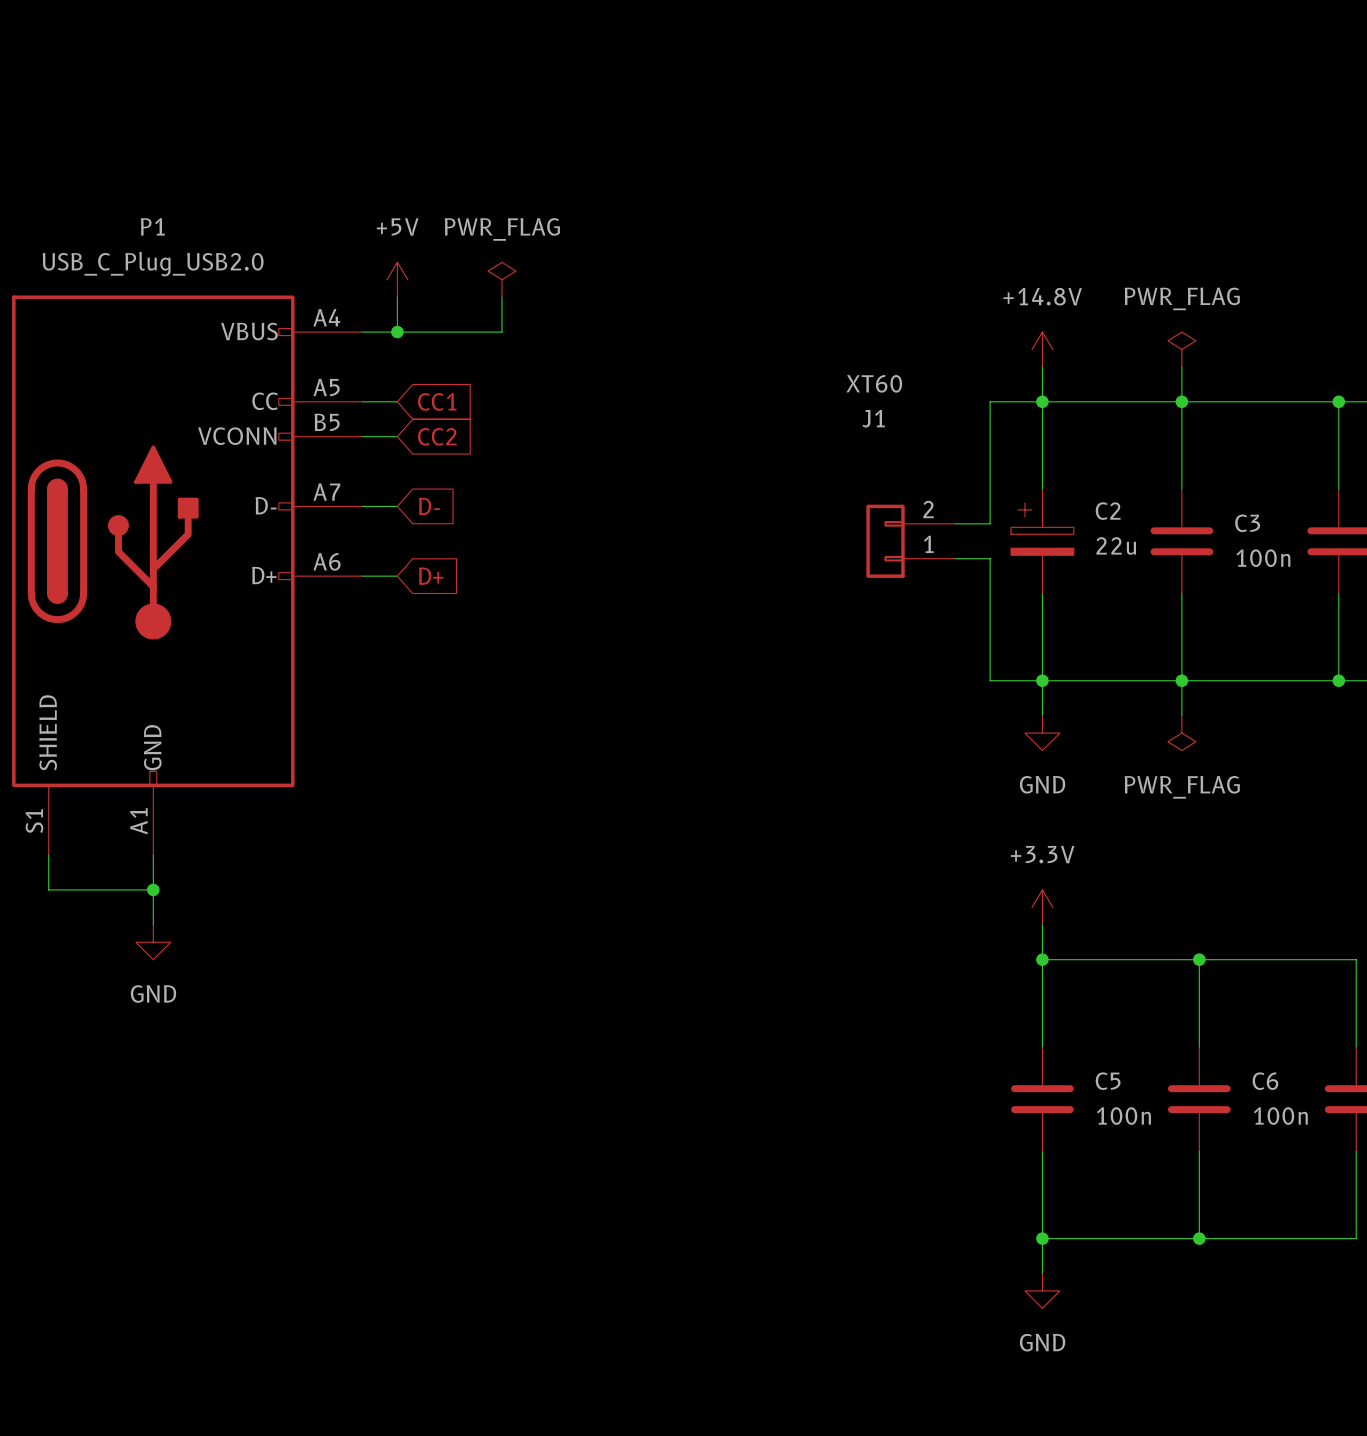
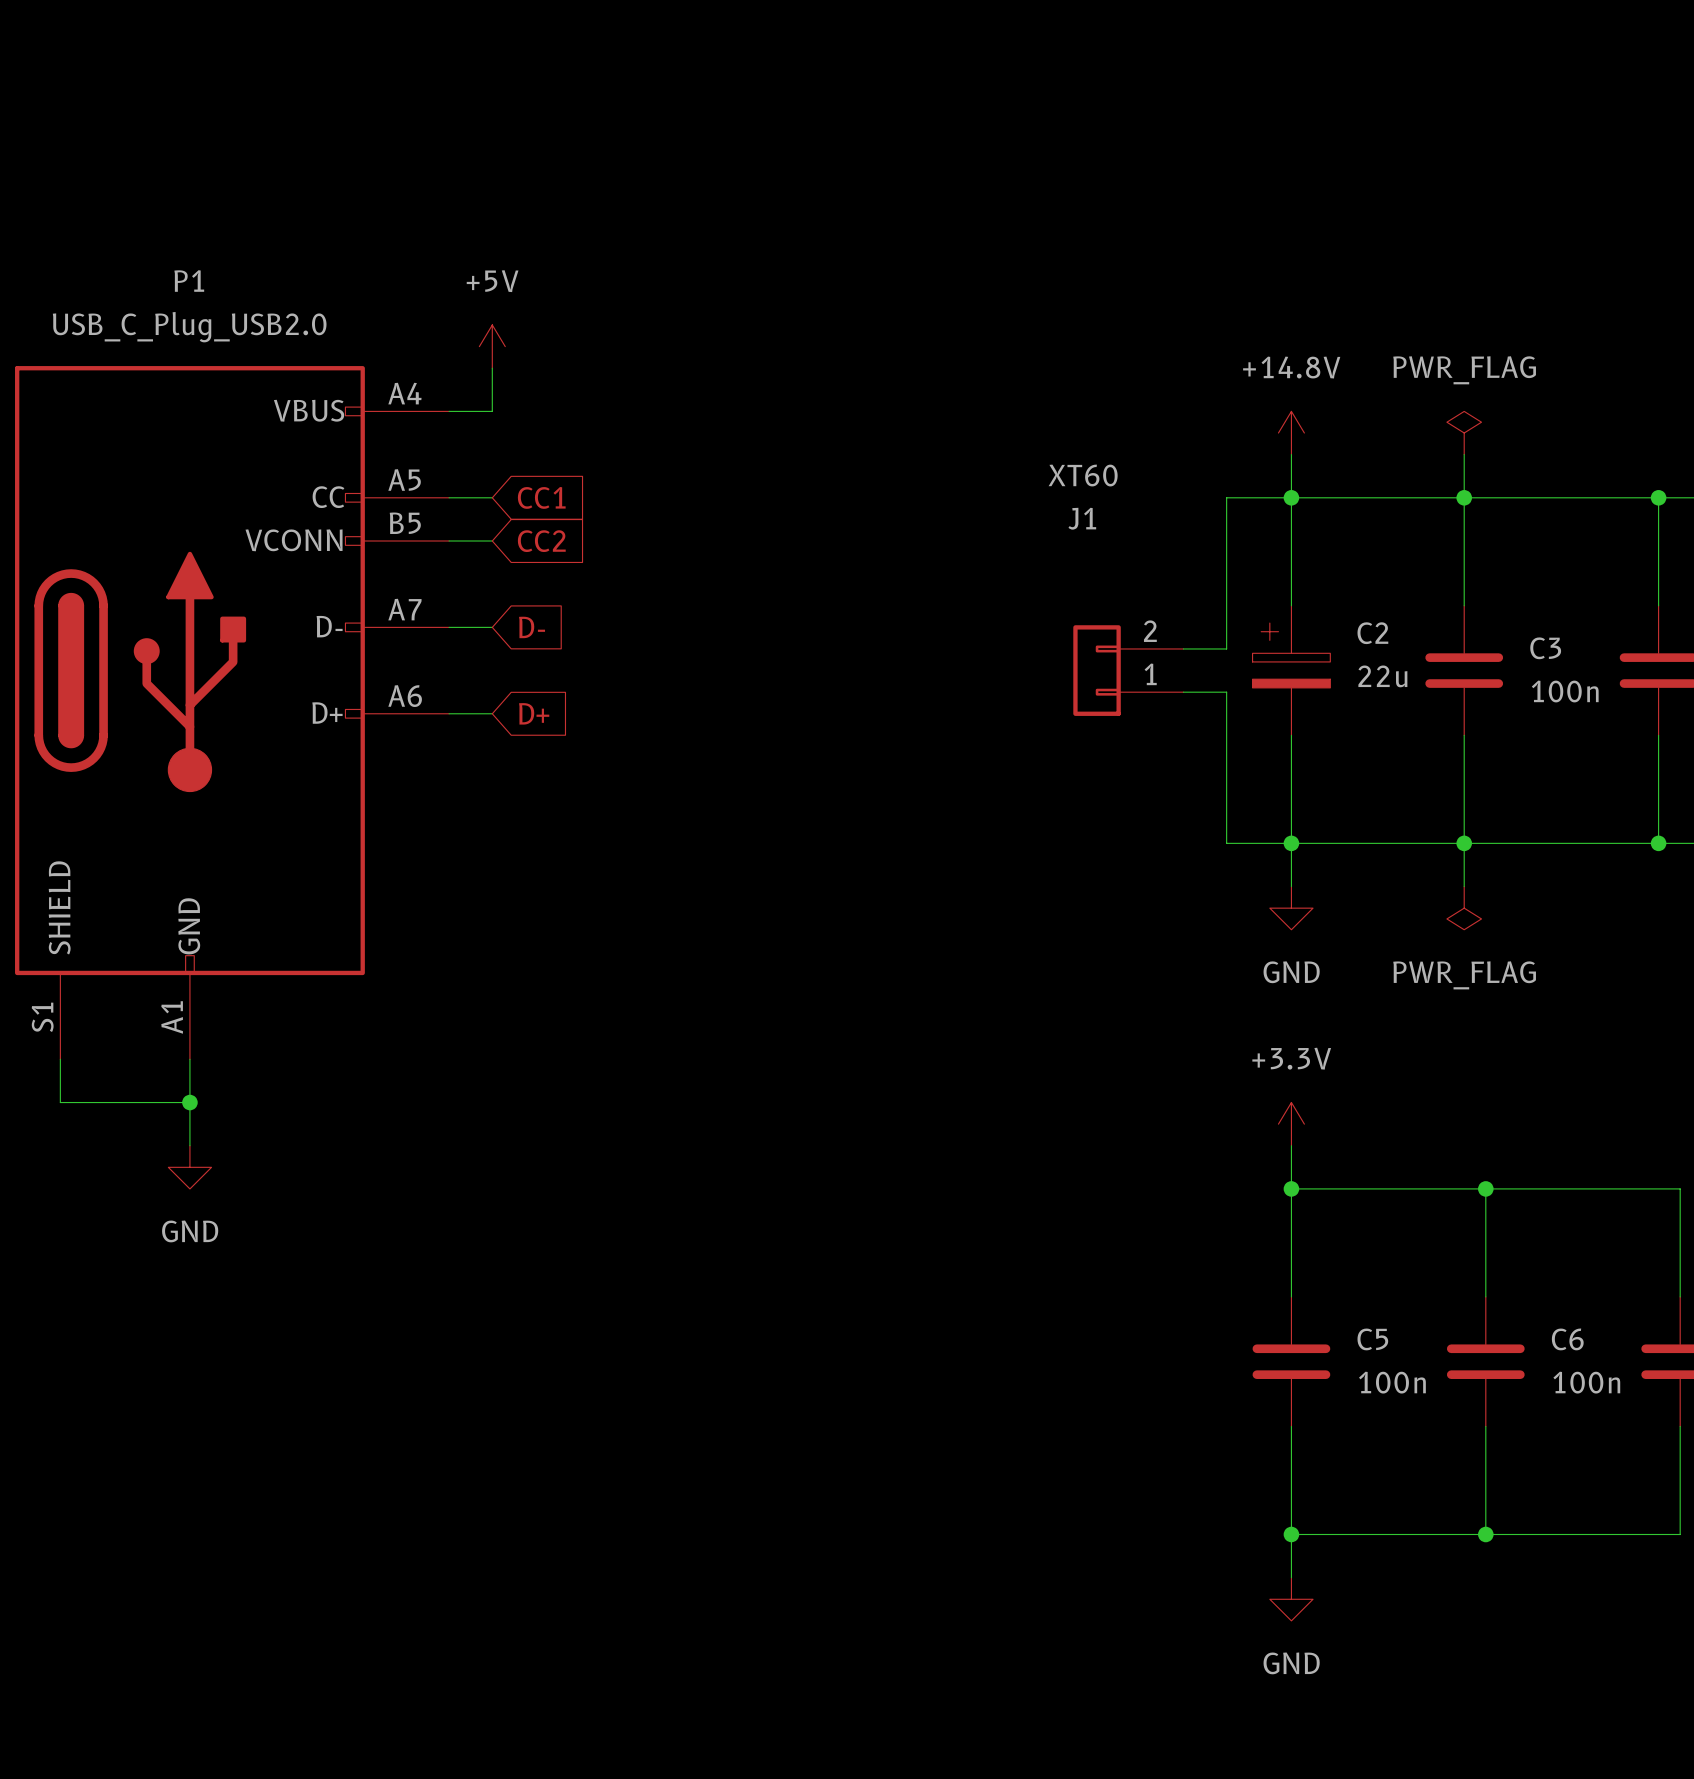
power symbol: PWR_FLAG (501, 279) -> none
wire: (501, 297) (501, 332) (397, 332) -> none
junction: (397, 332) -> none

